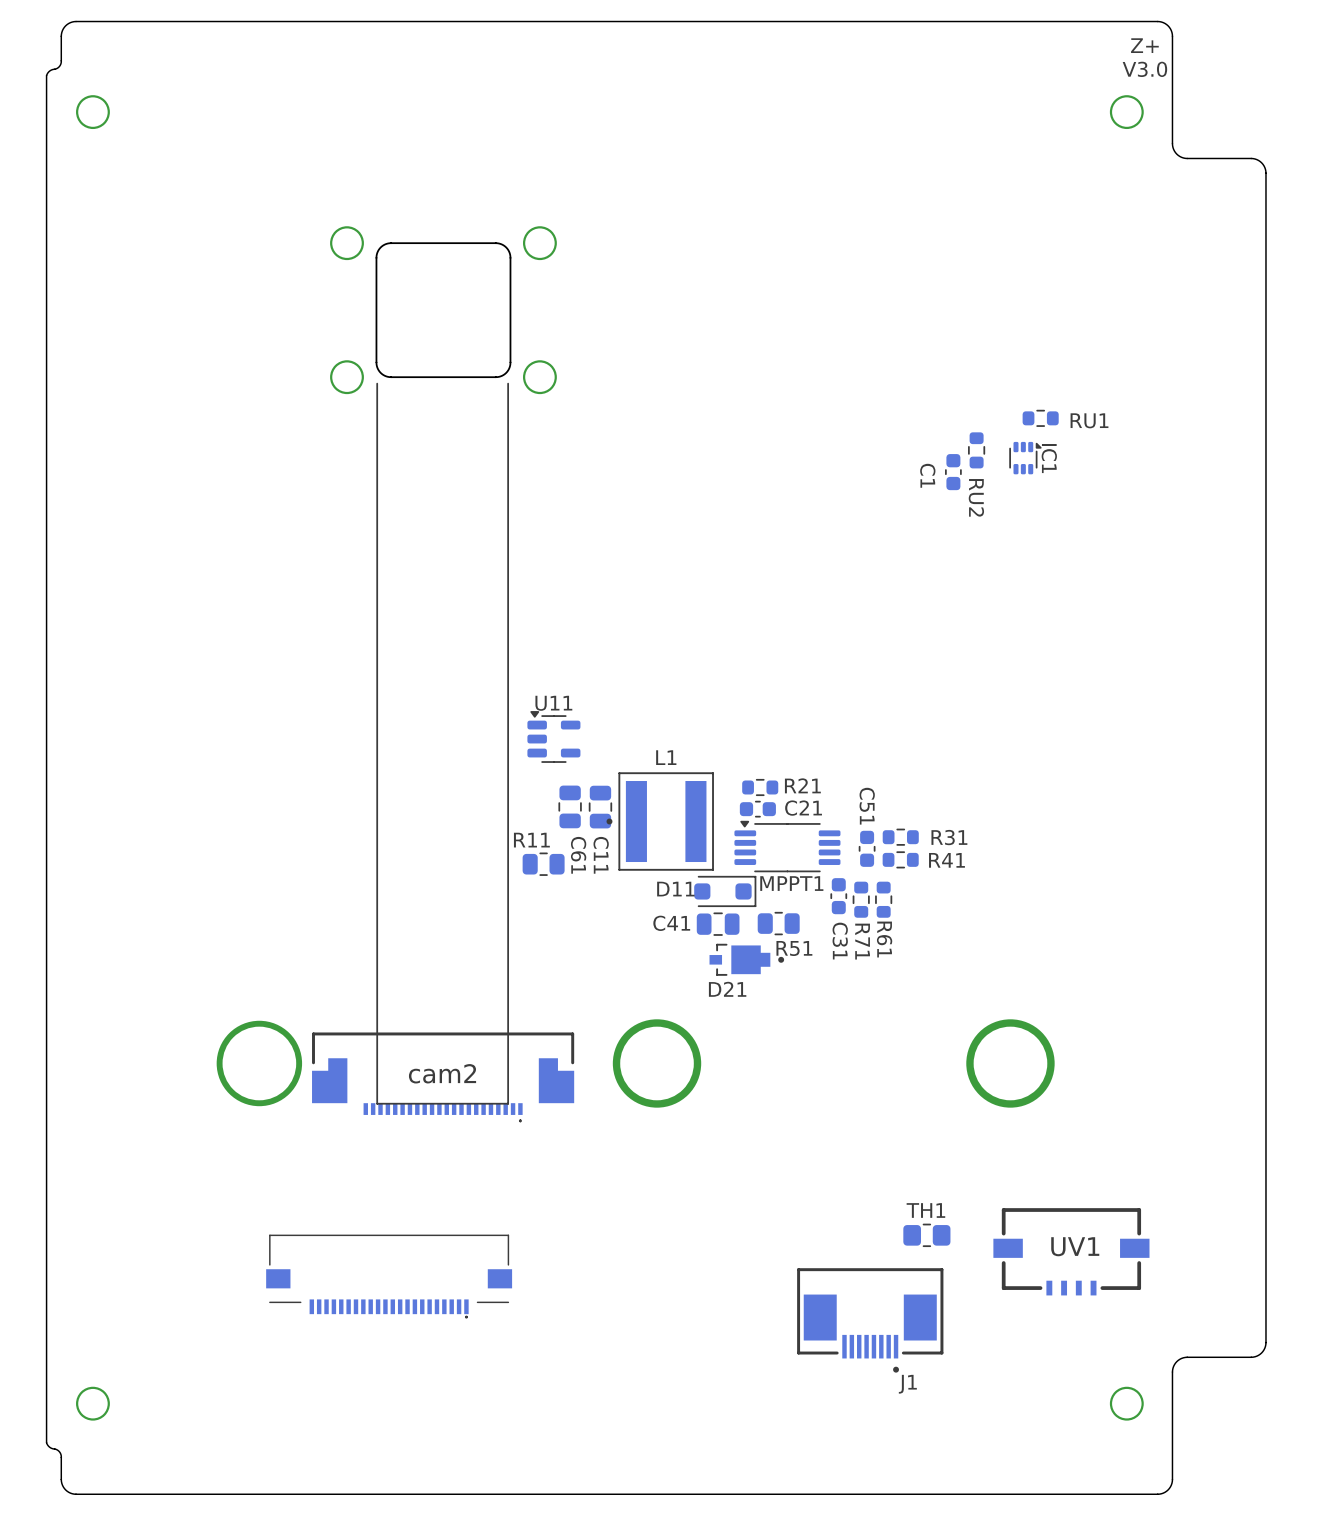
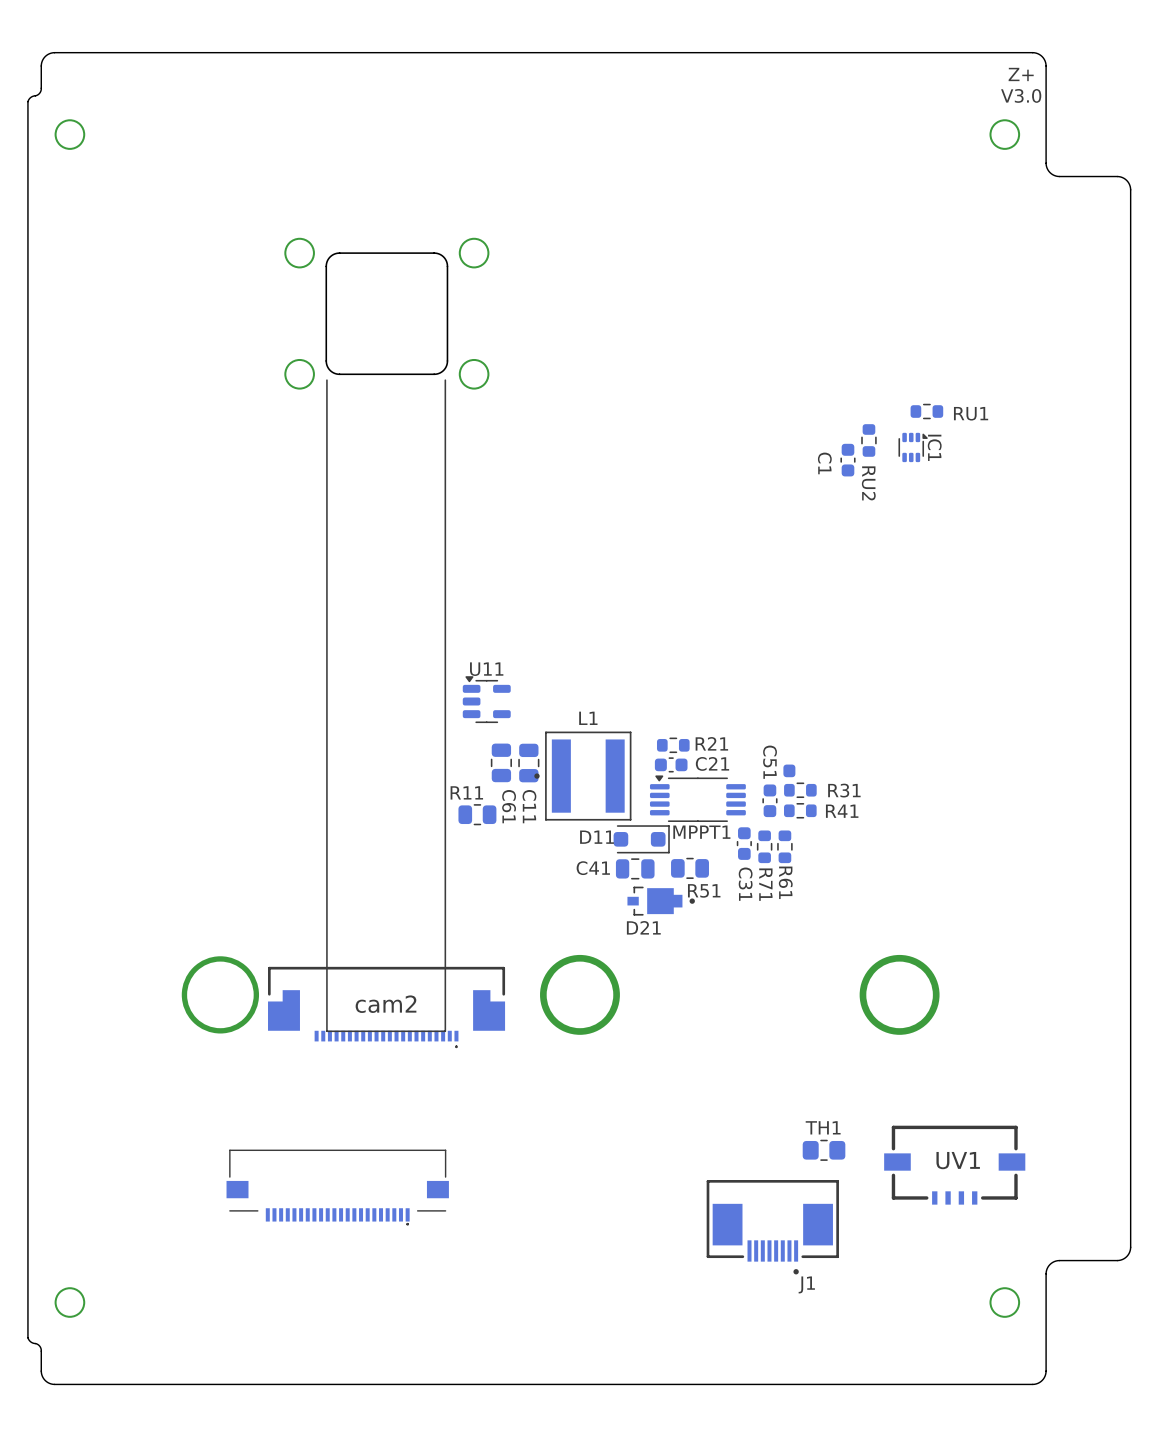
part: none -> (789, 770)

